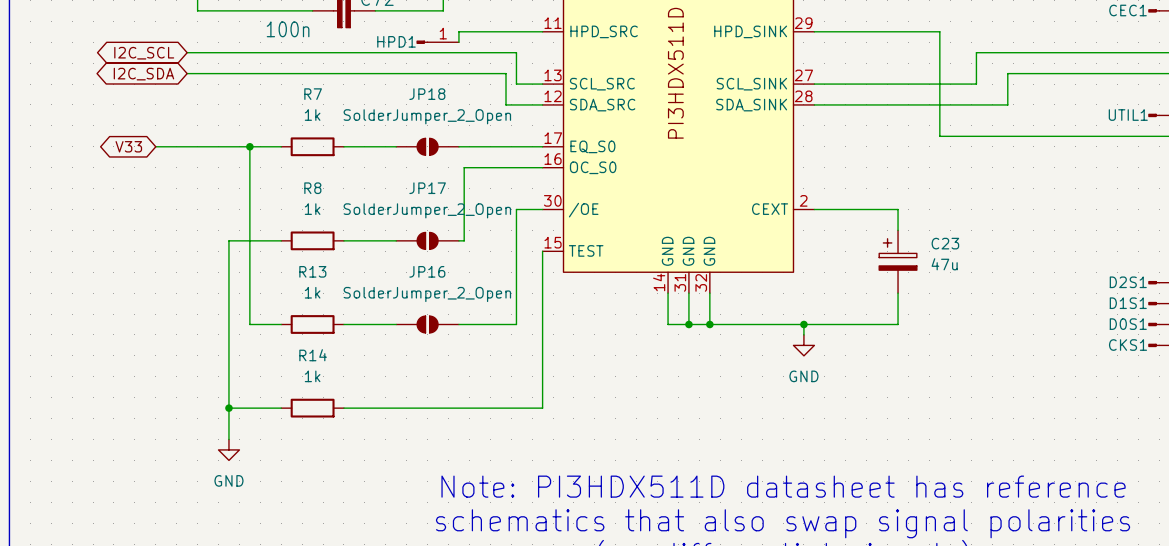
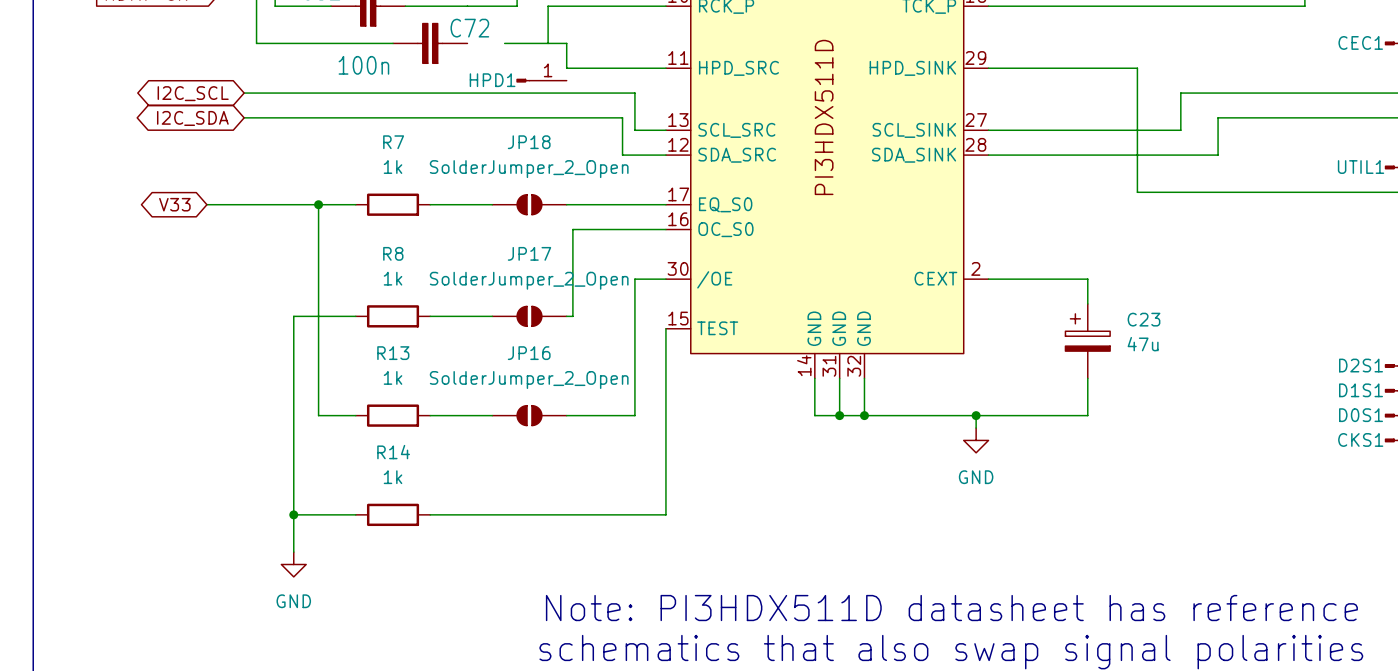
wire: (375, 10) (406, 10) -> none
wire: (458, 31) (458, 42) -> (566, 68) (566, 43) (548, 43)

